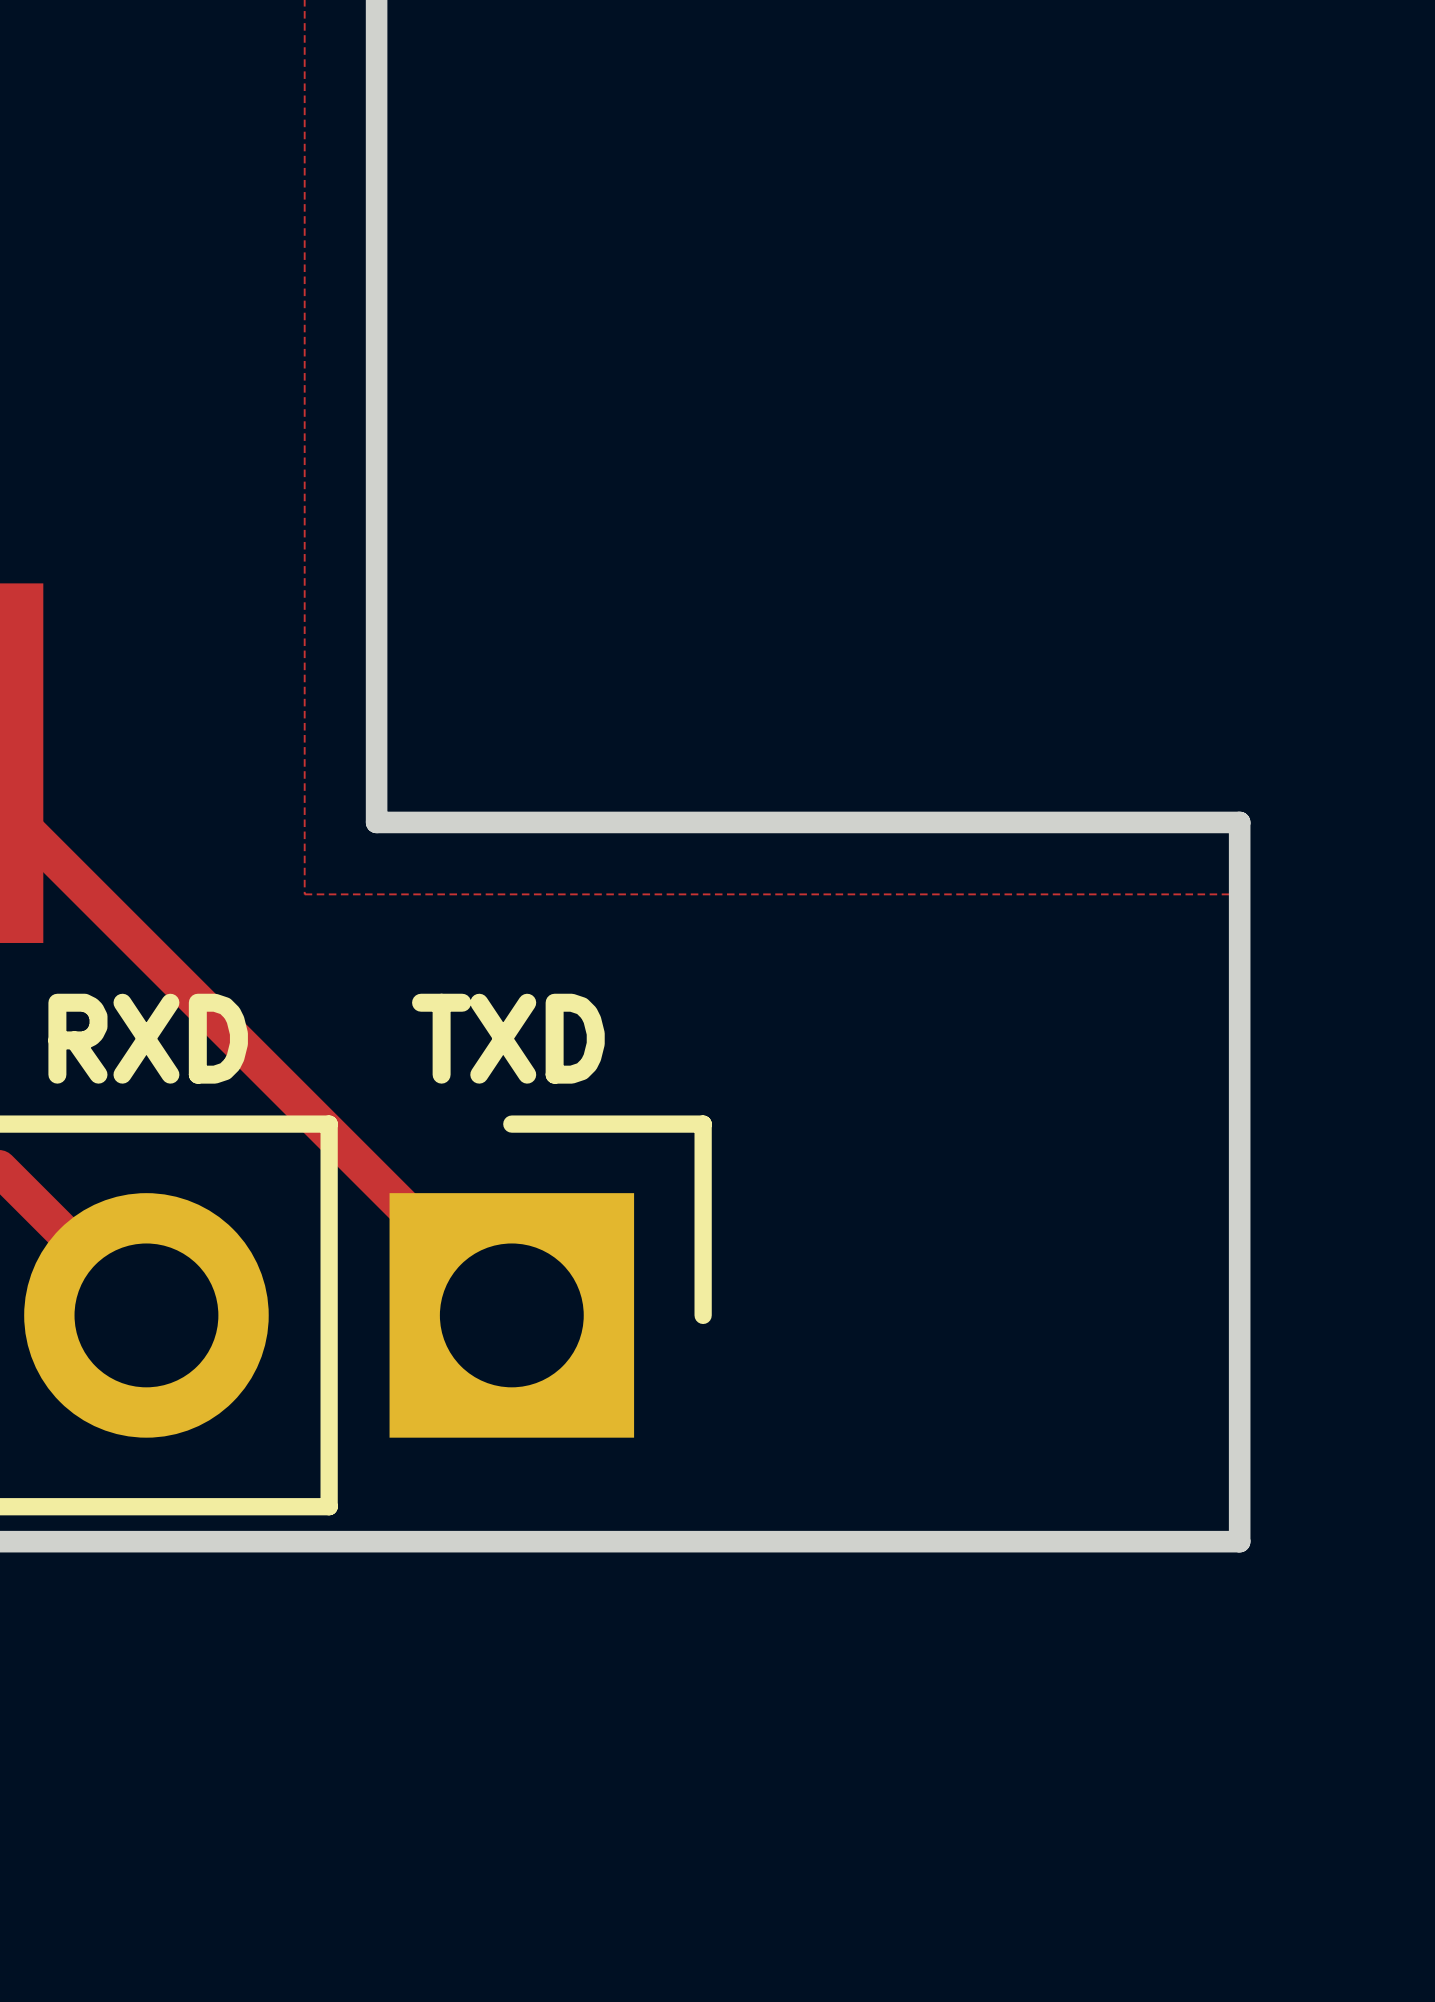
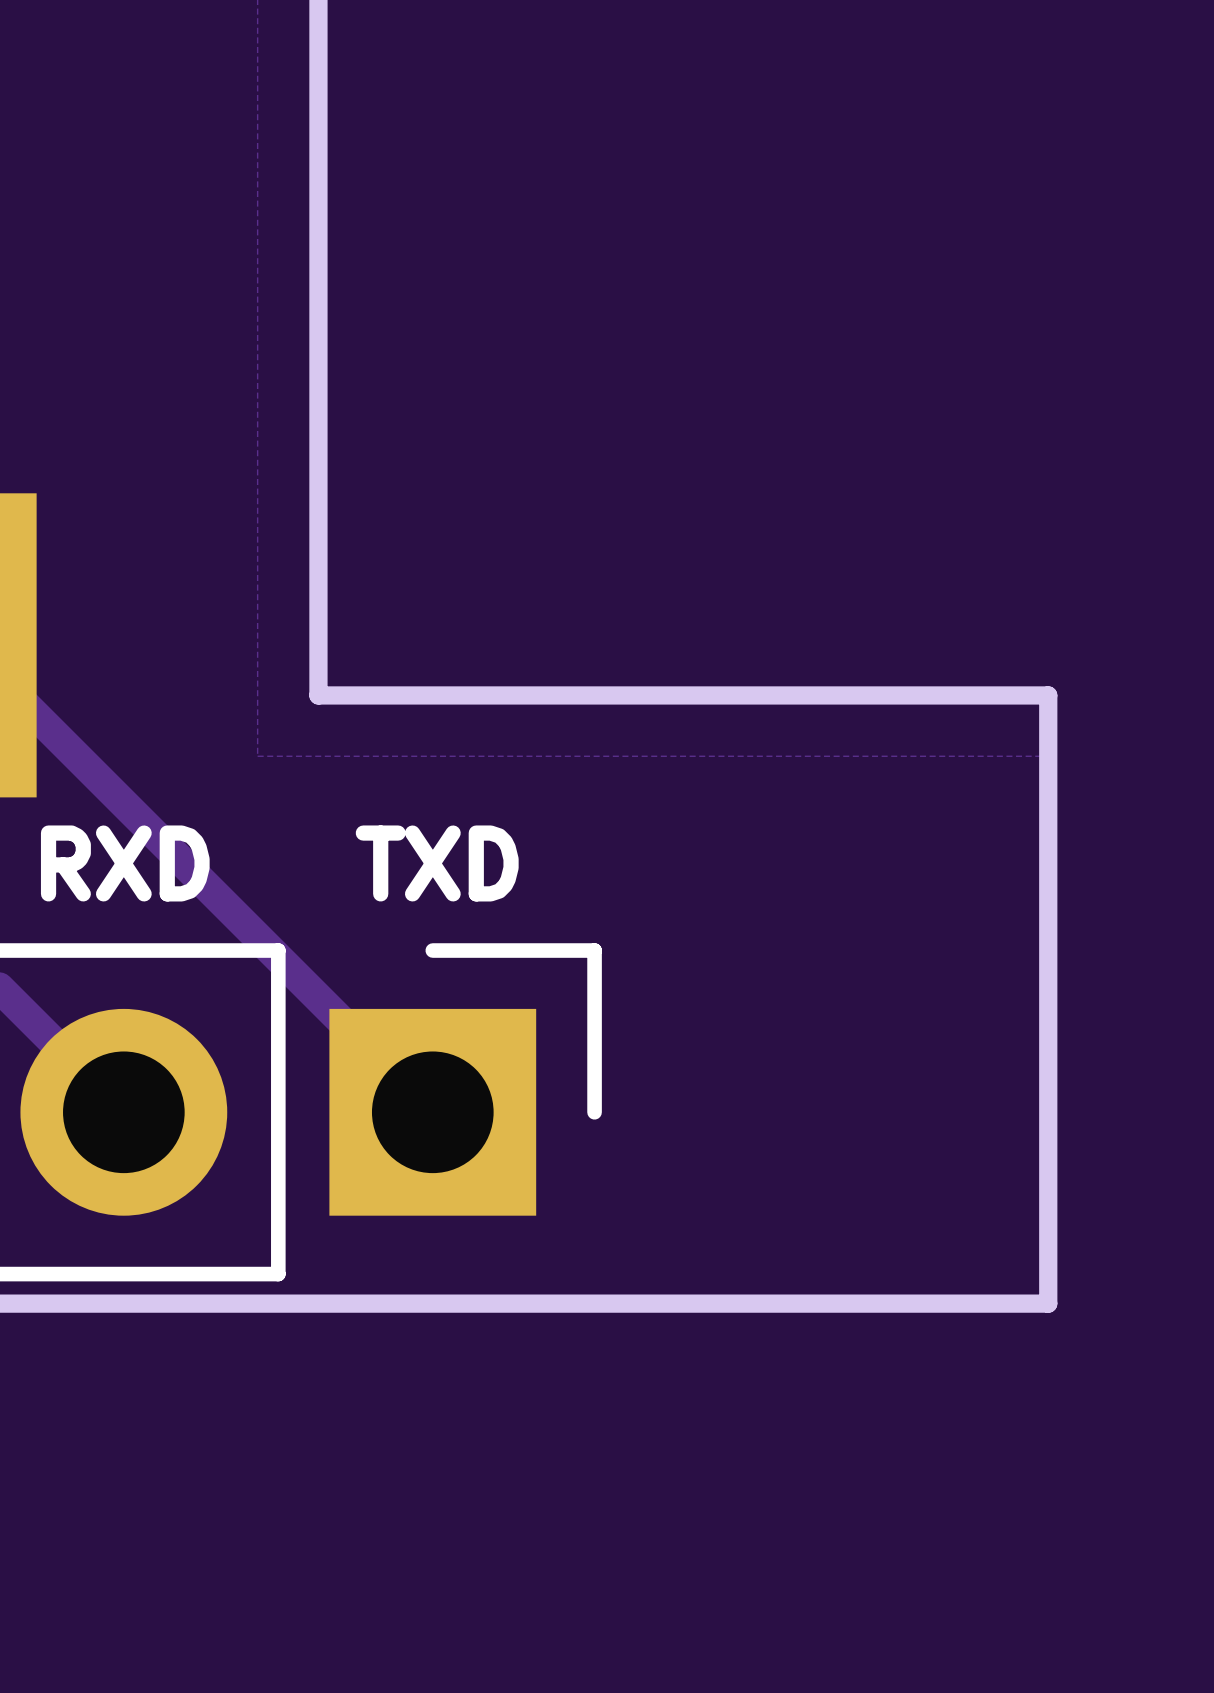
text position: RXD (148, 1038) -> RXD (125, 863)
text position: TXD (508, 1038) -> TXD (437, 863)

